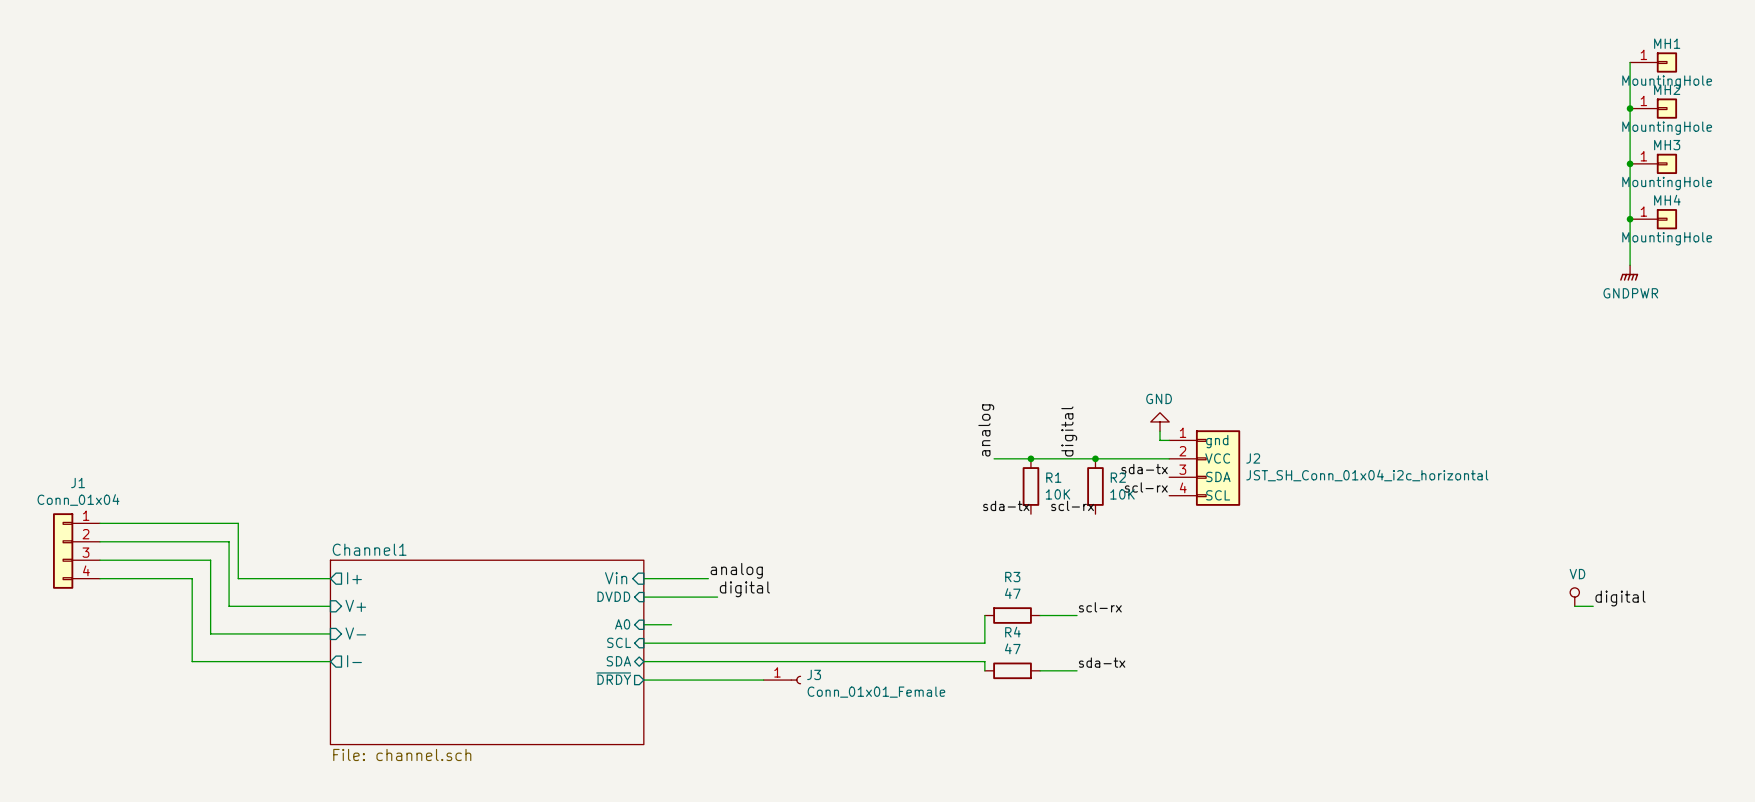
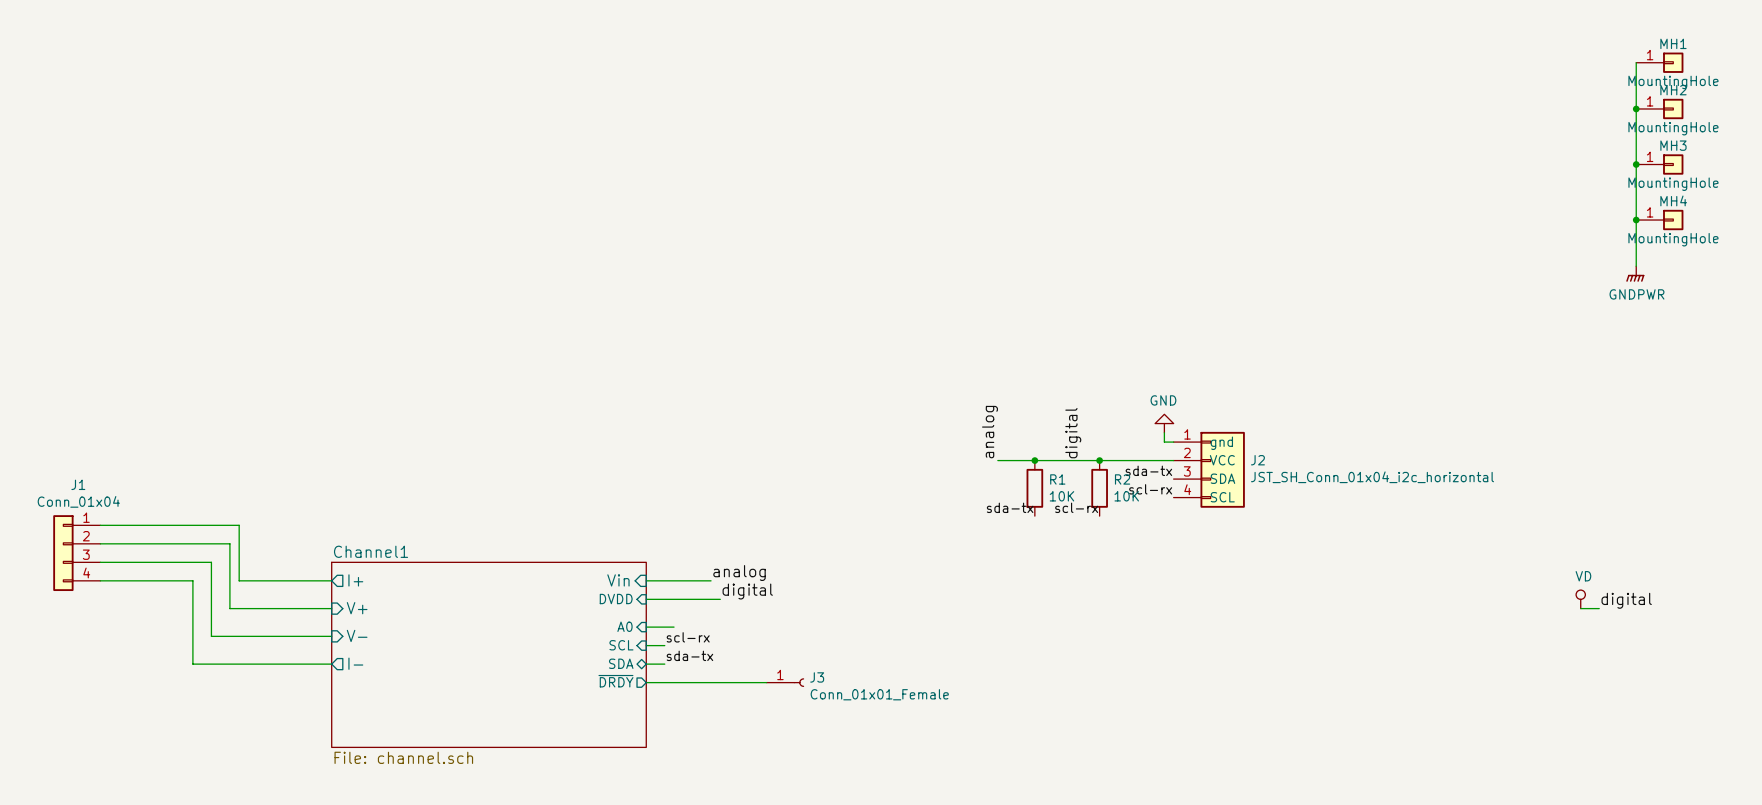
label: scl-rx (1100, 607) -> none
wire: (984, 615) (984, 643) (662, 643) -> none
R3: 47 (1012, 615) -> none
wire: (1040, 615) (1077, 615) -> none
label: none -> scl-rx (688, 637)
label: none -> sda-tx (689, 655)
wire: (662, 661) (984, 661) (984, 670) -> none
label: sda-tx (1102, 662) -> none
R4: 47 (1012, 670) -> none
wire: (1040, 670) (1077, 670) -> none

